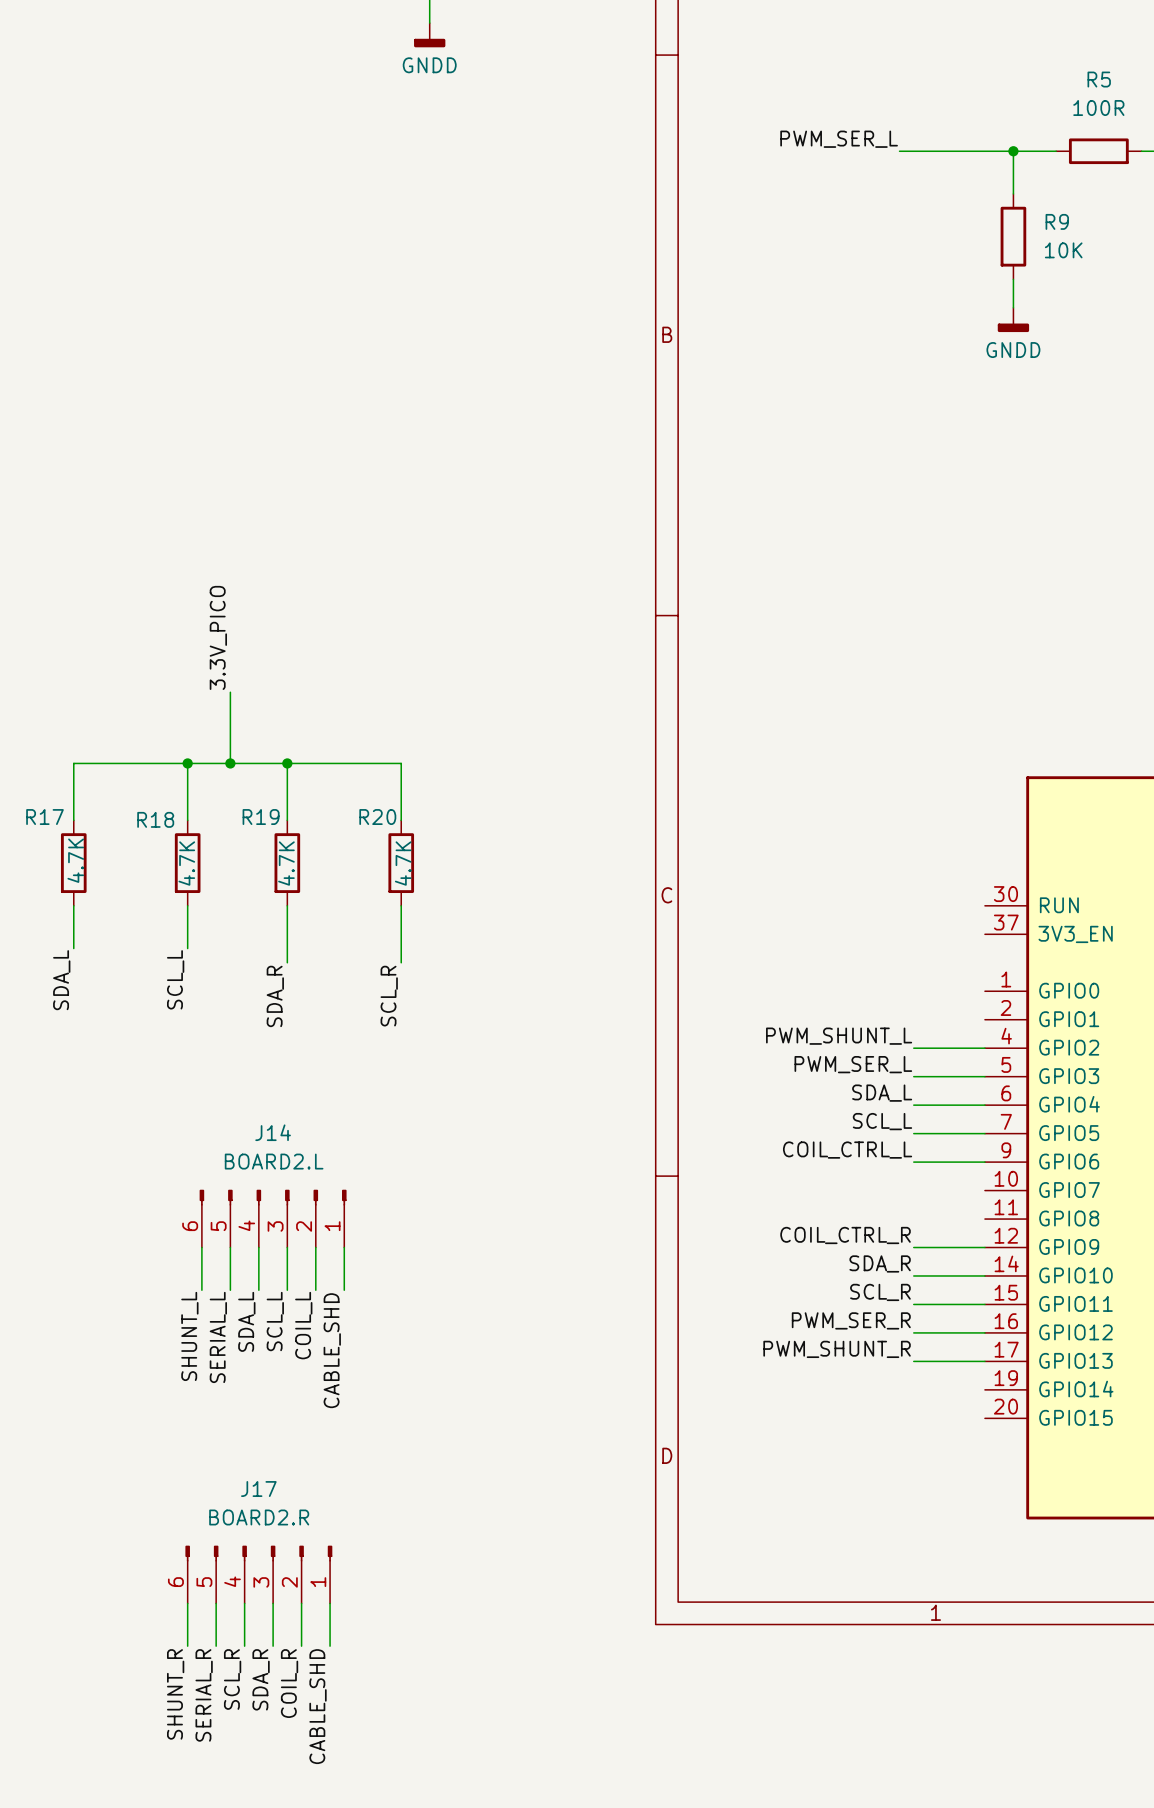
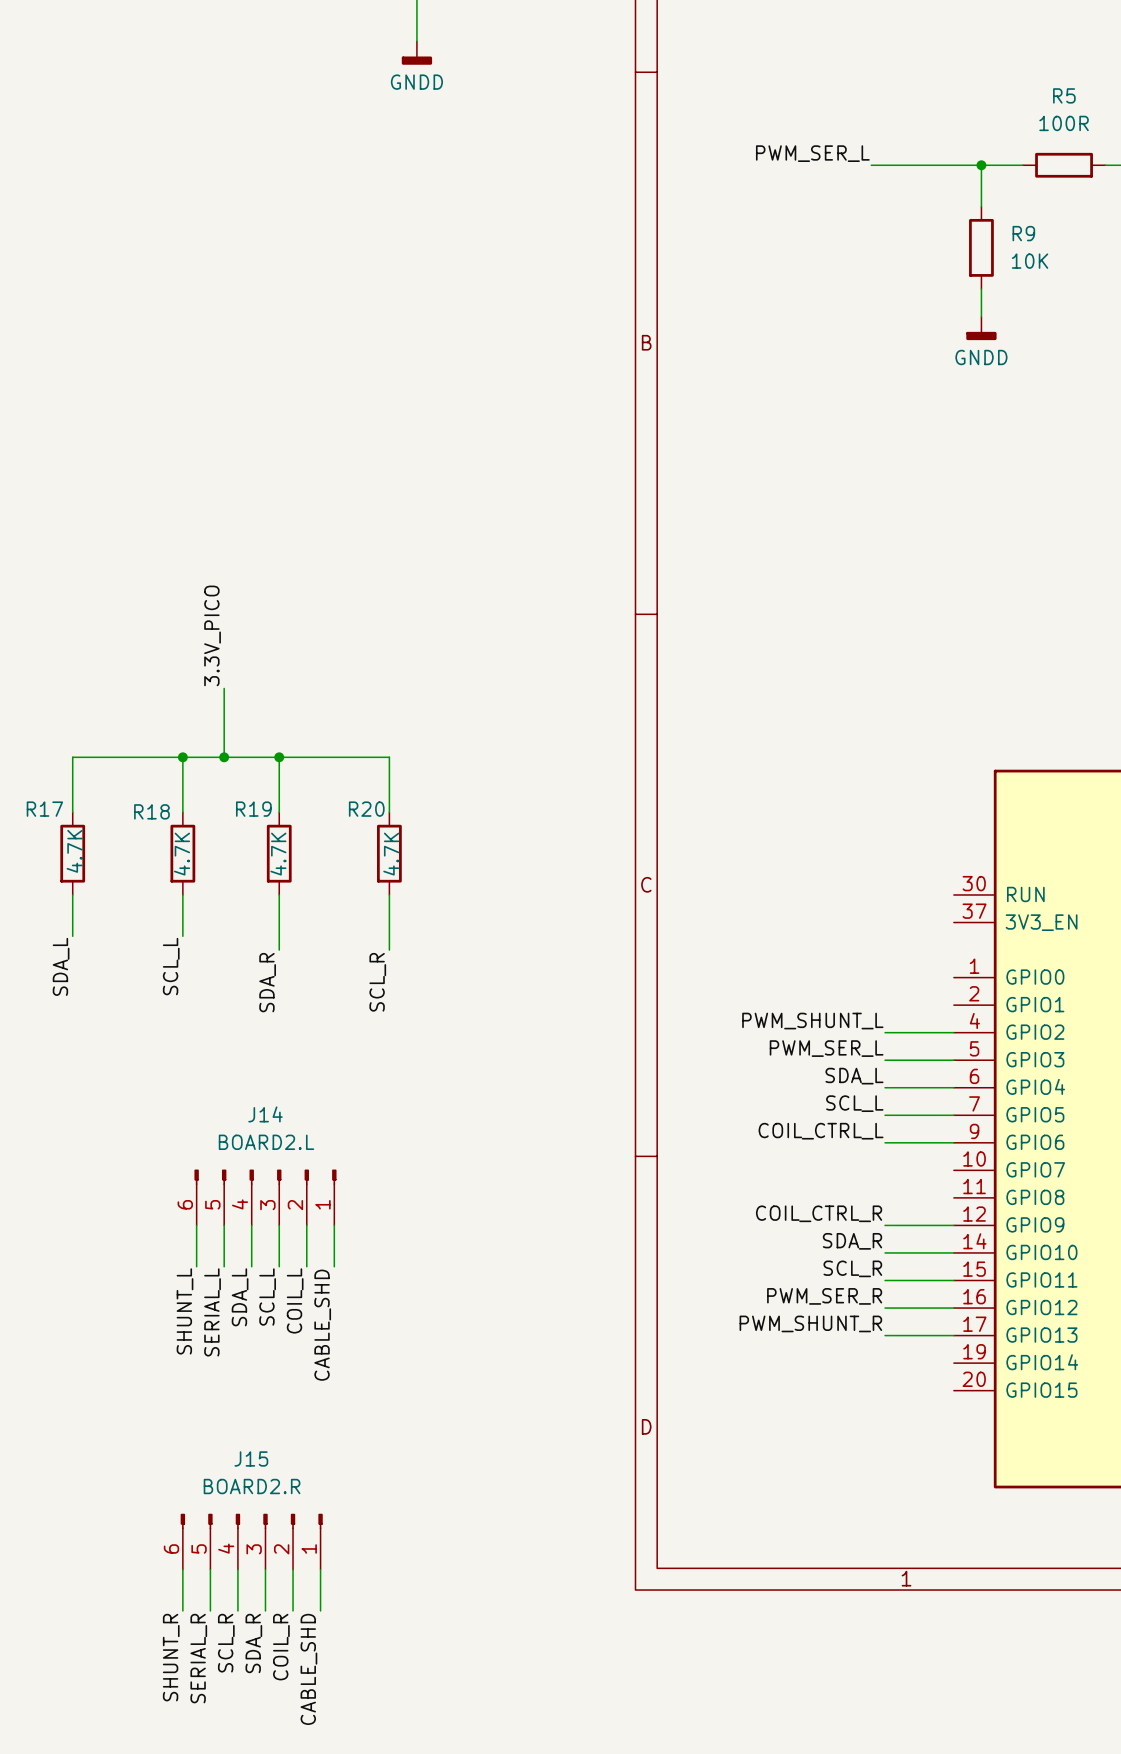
J17 name: J17 (258, 1489) -> J15 (251, 1458)

